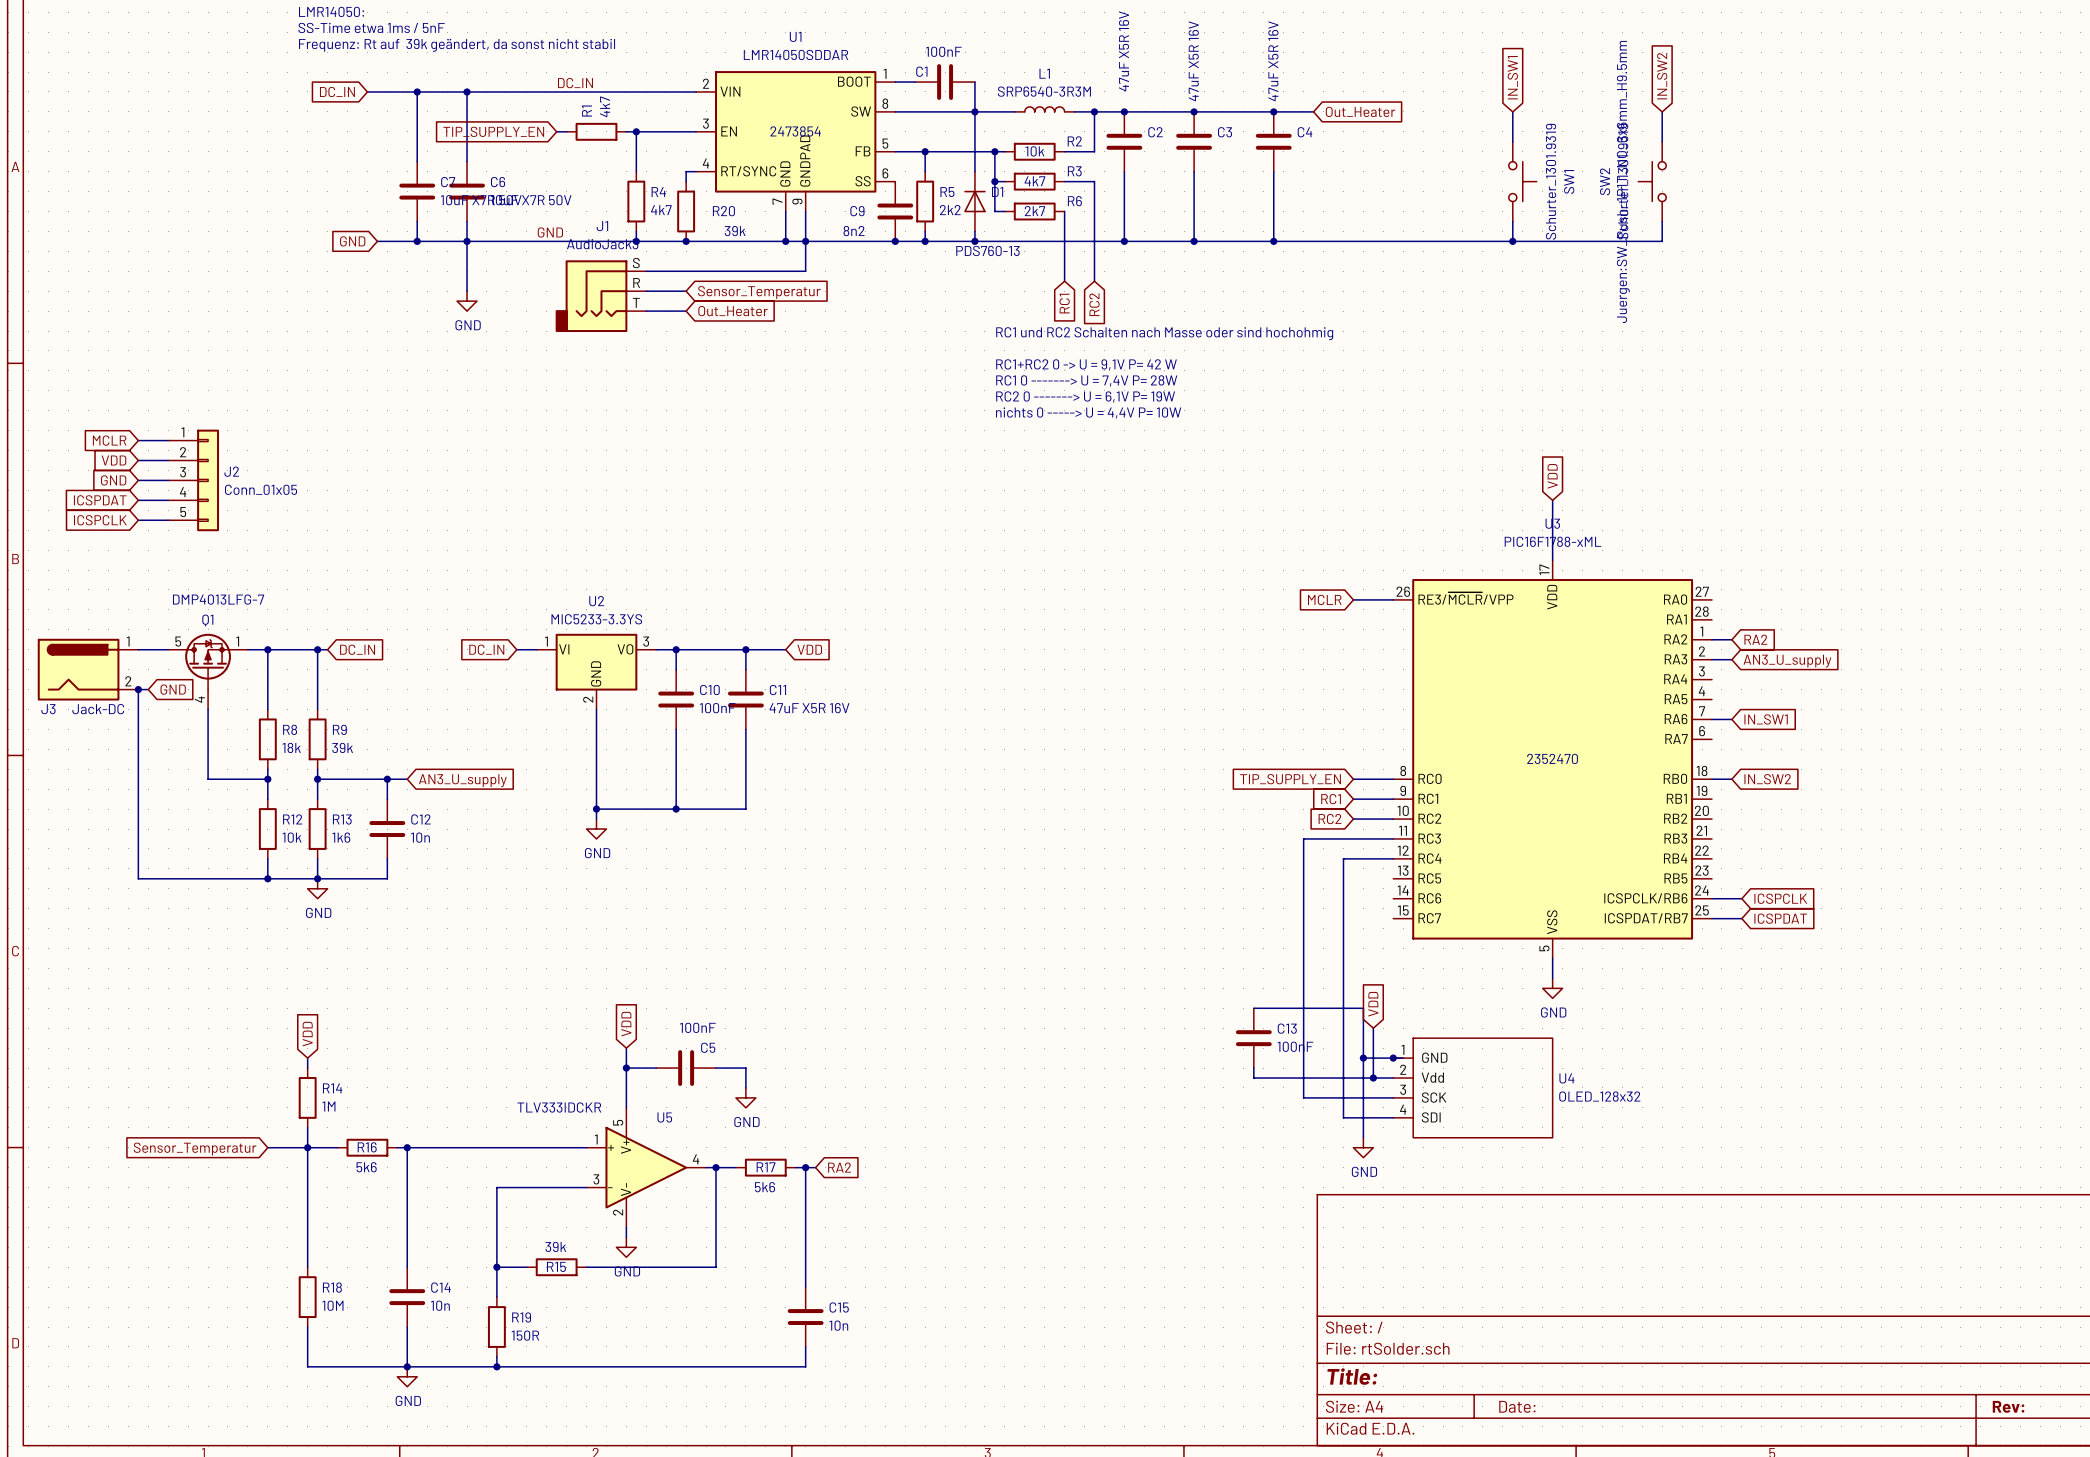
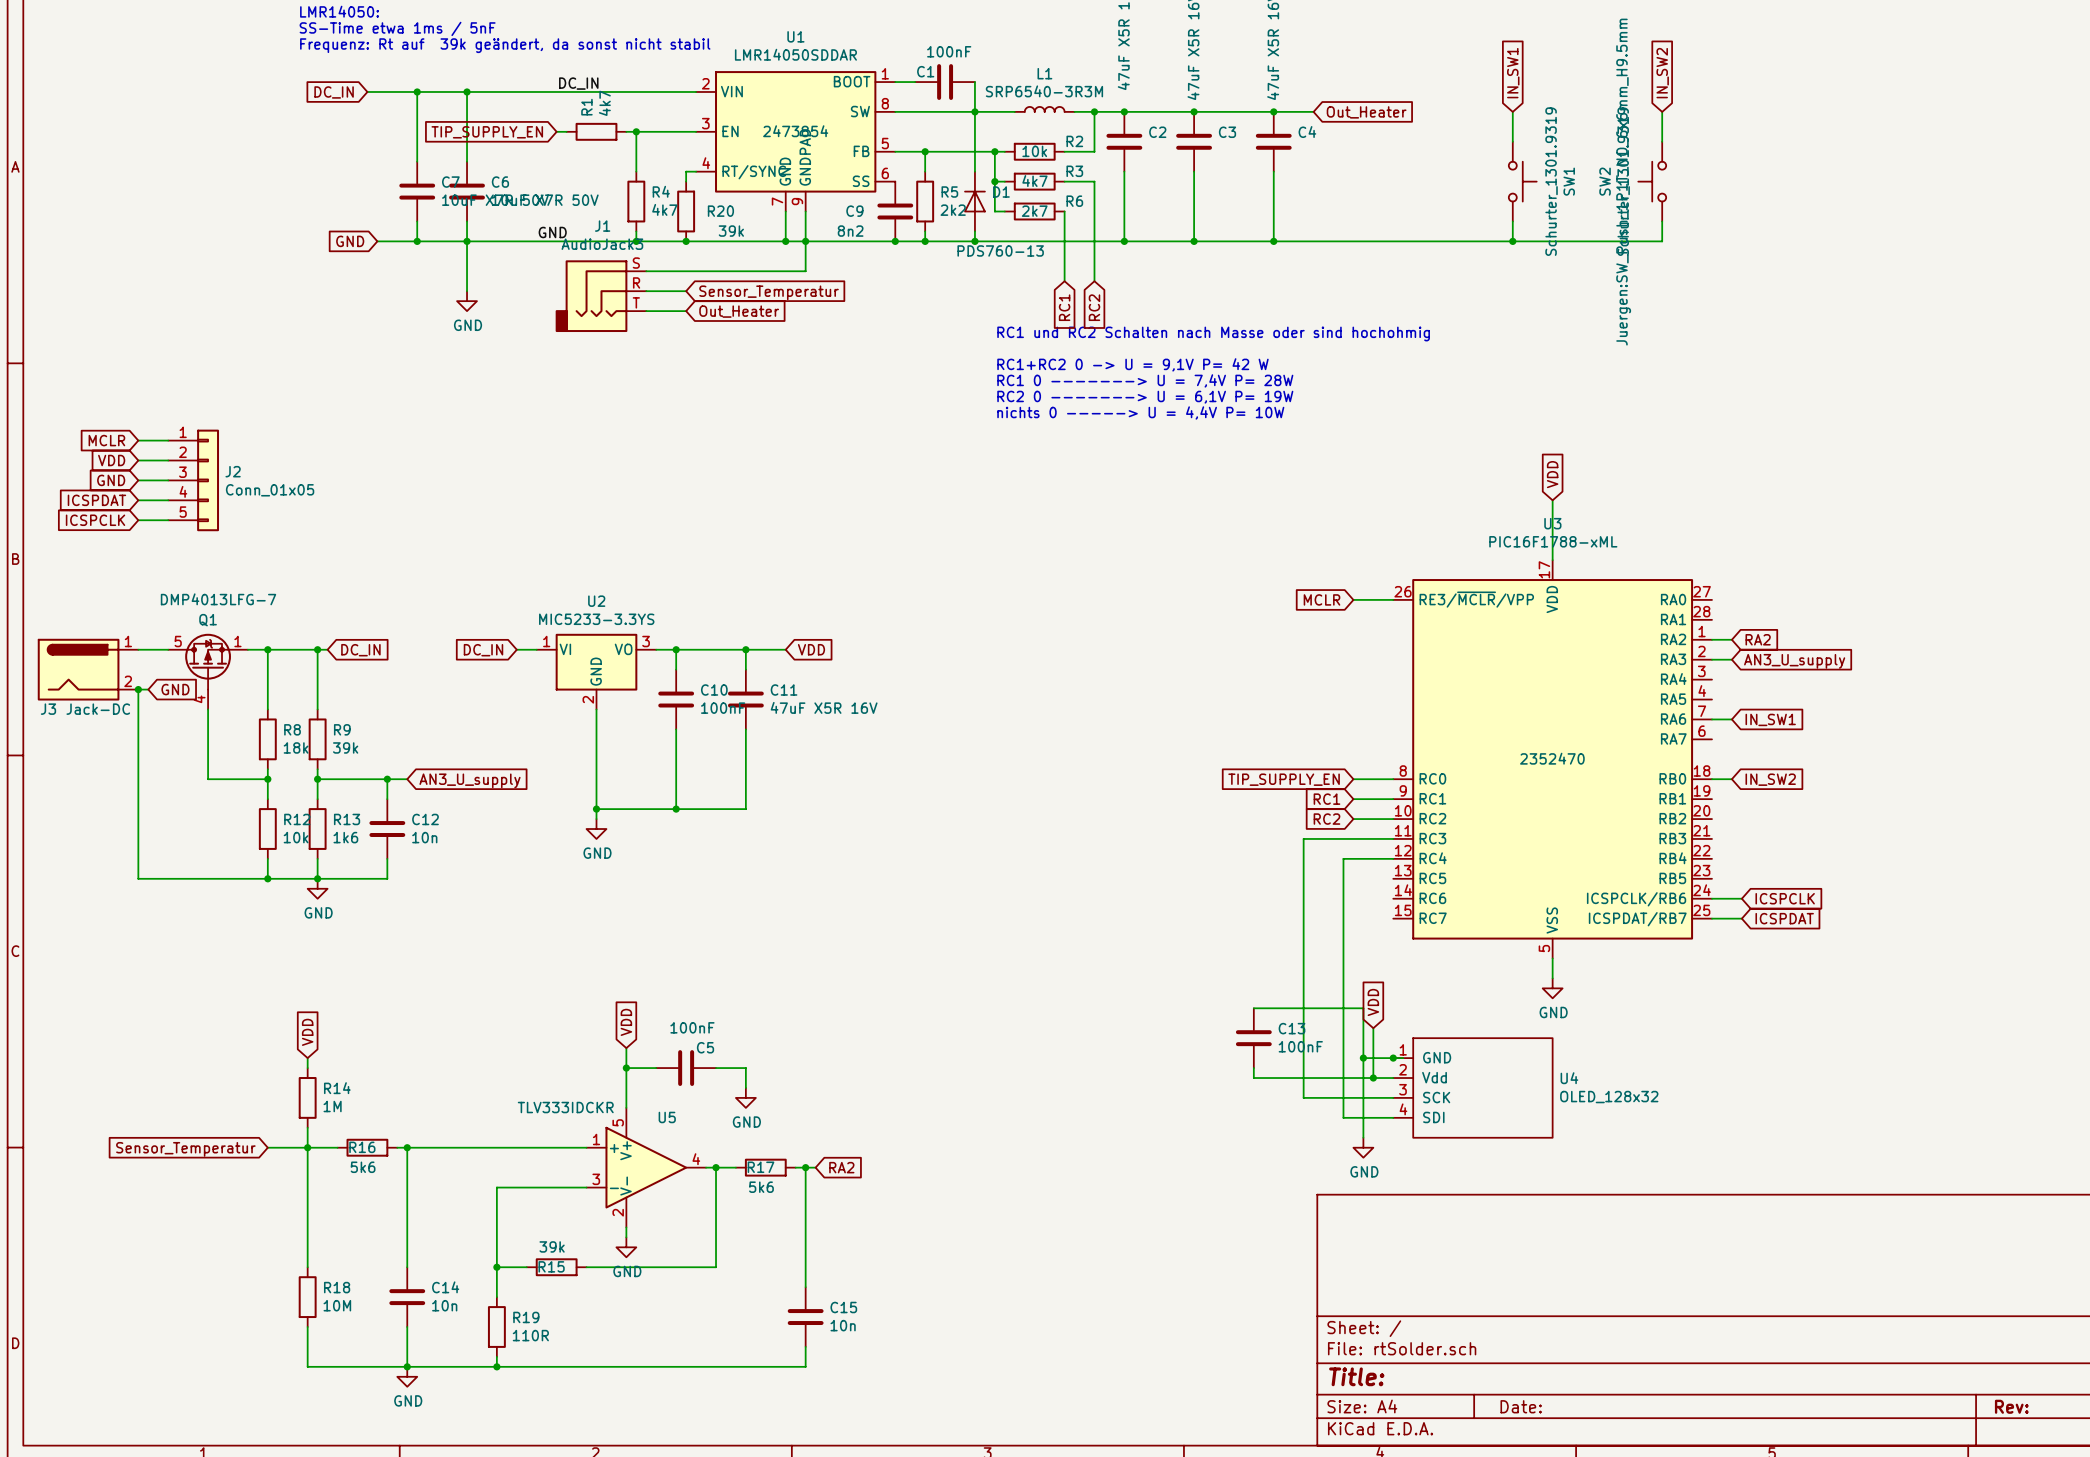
R19 value: 150R (525, 1335) -> 110R (530, 1335)

